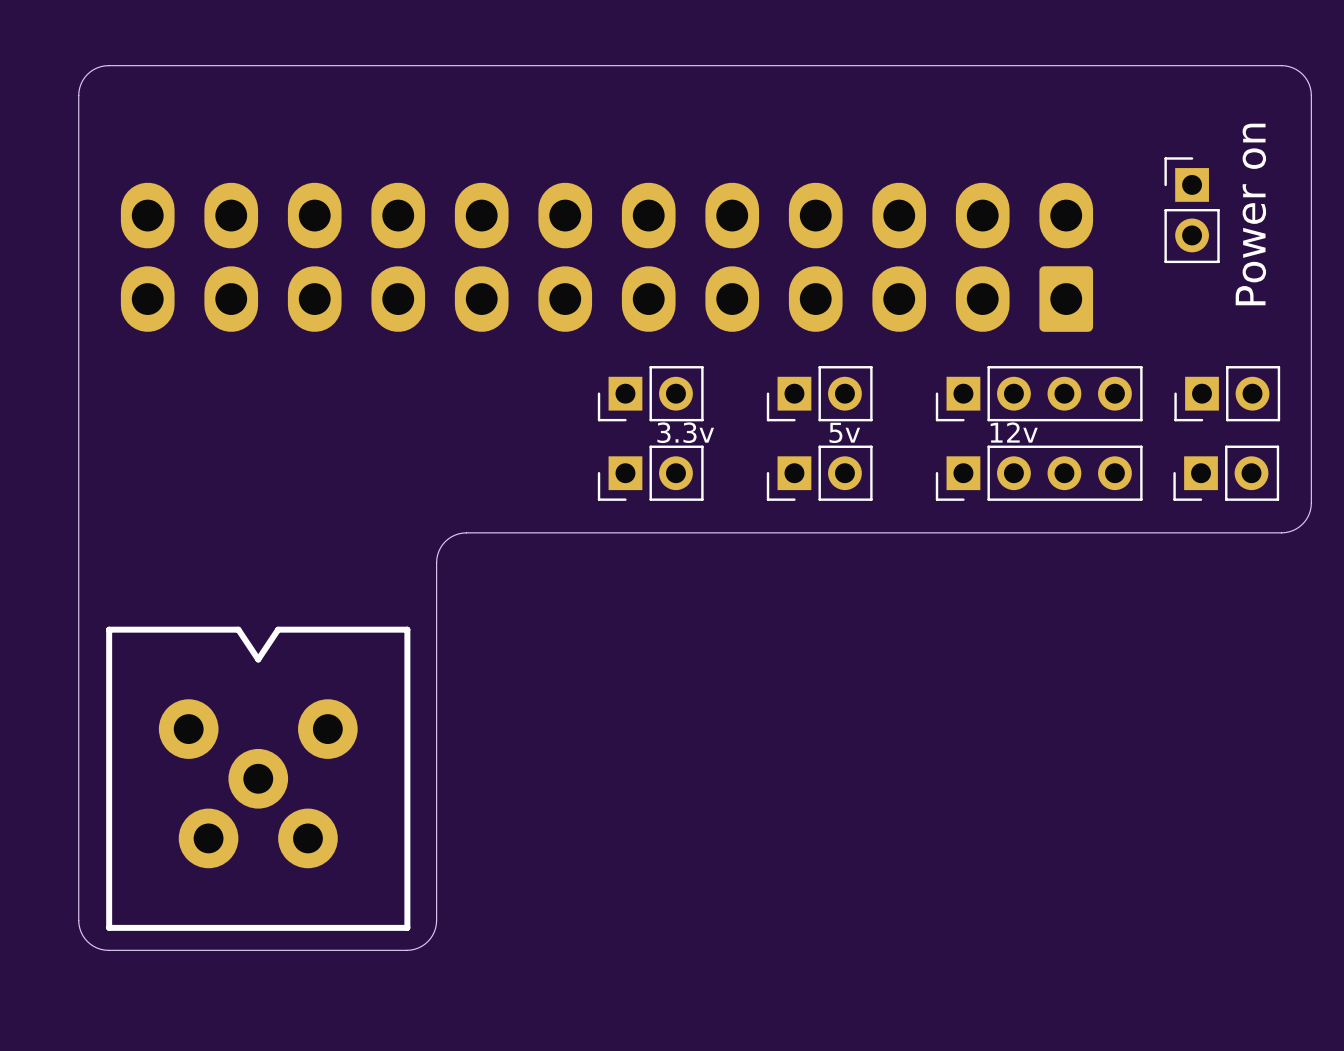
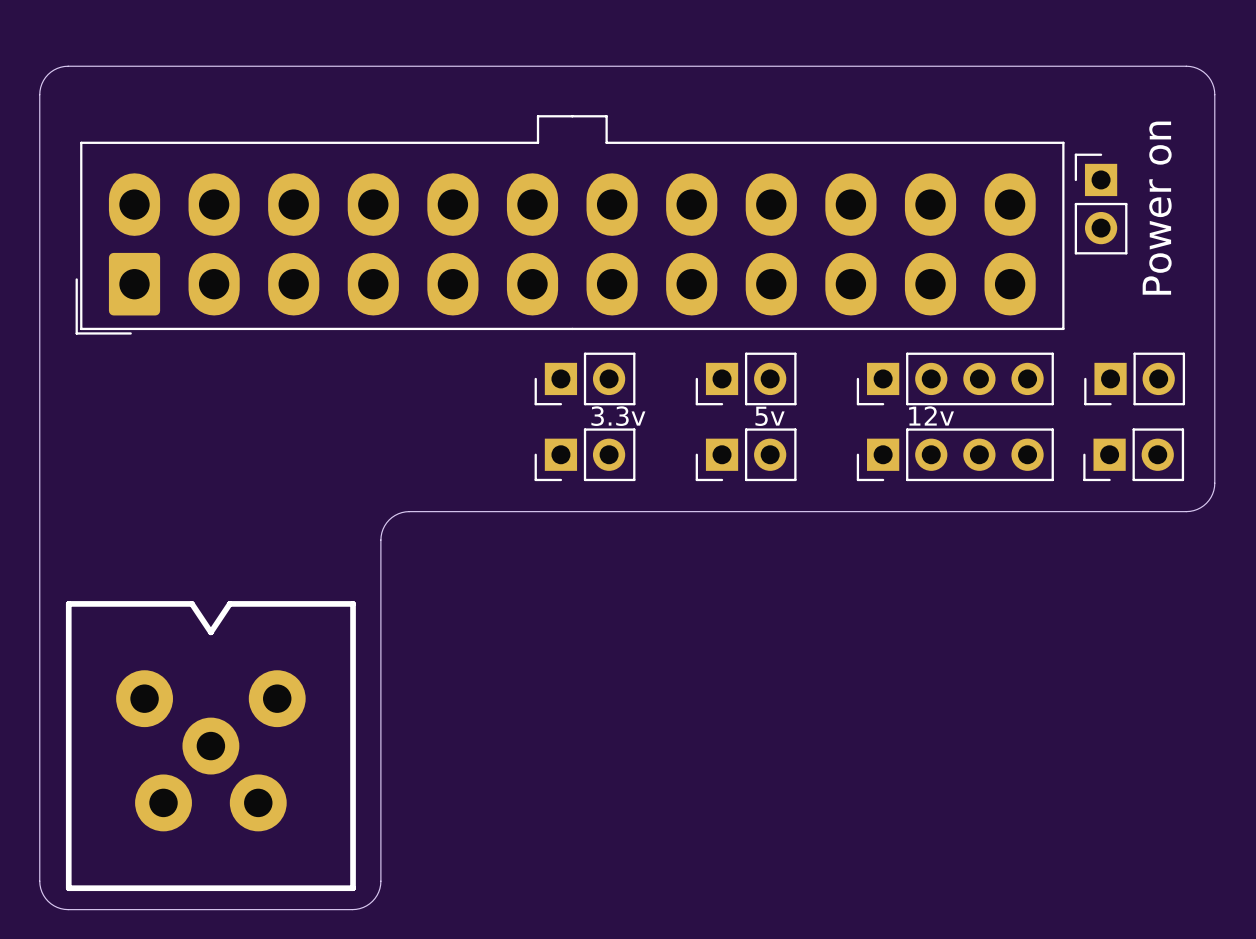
part side: top (606, 257) -> bottom (570, 224)

